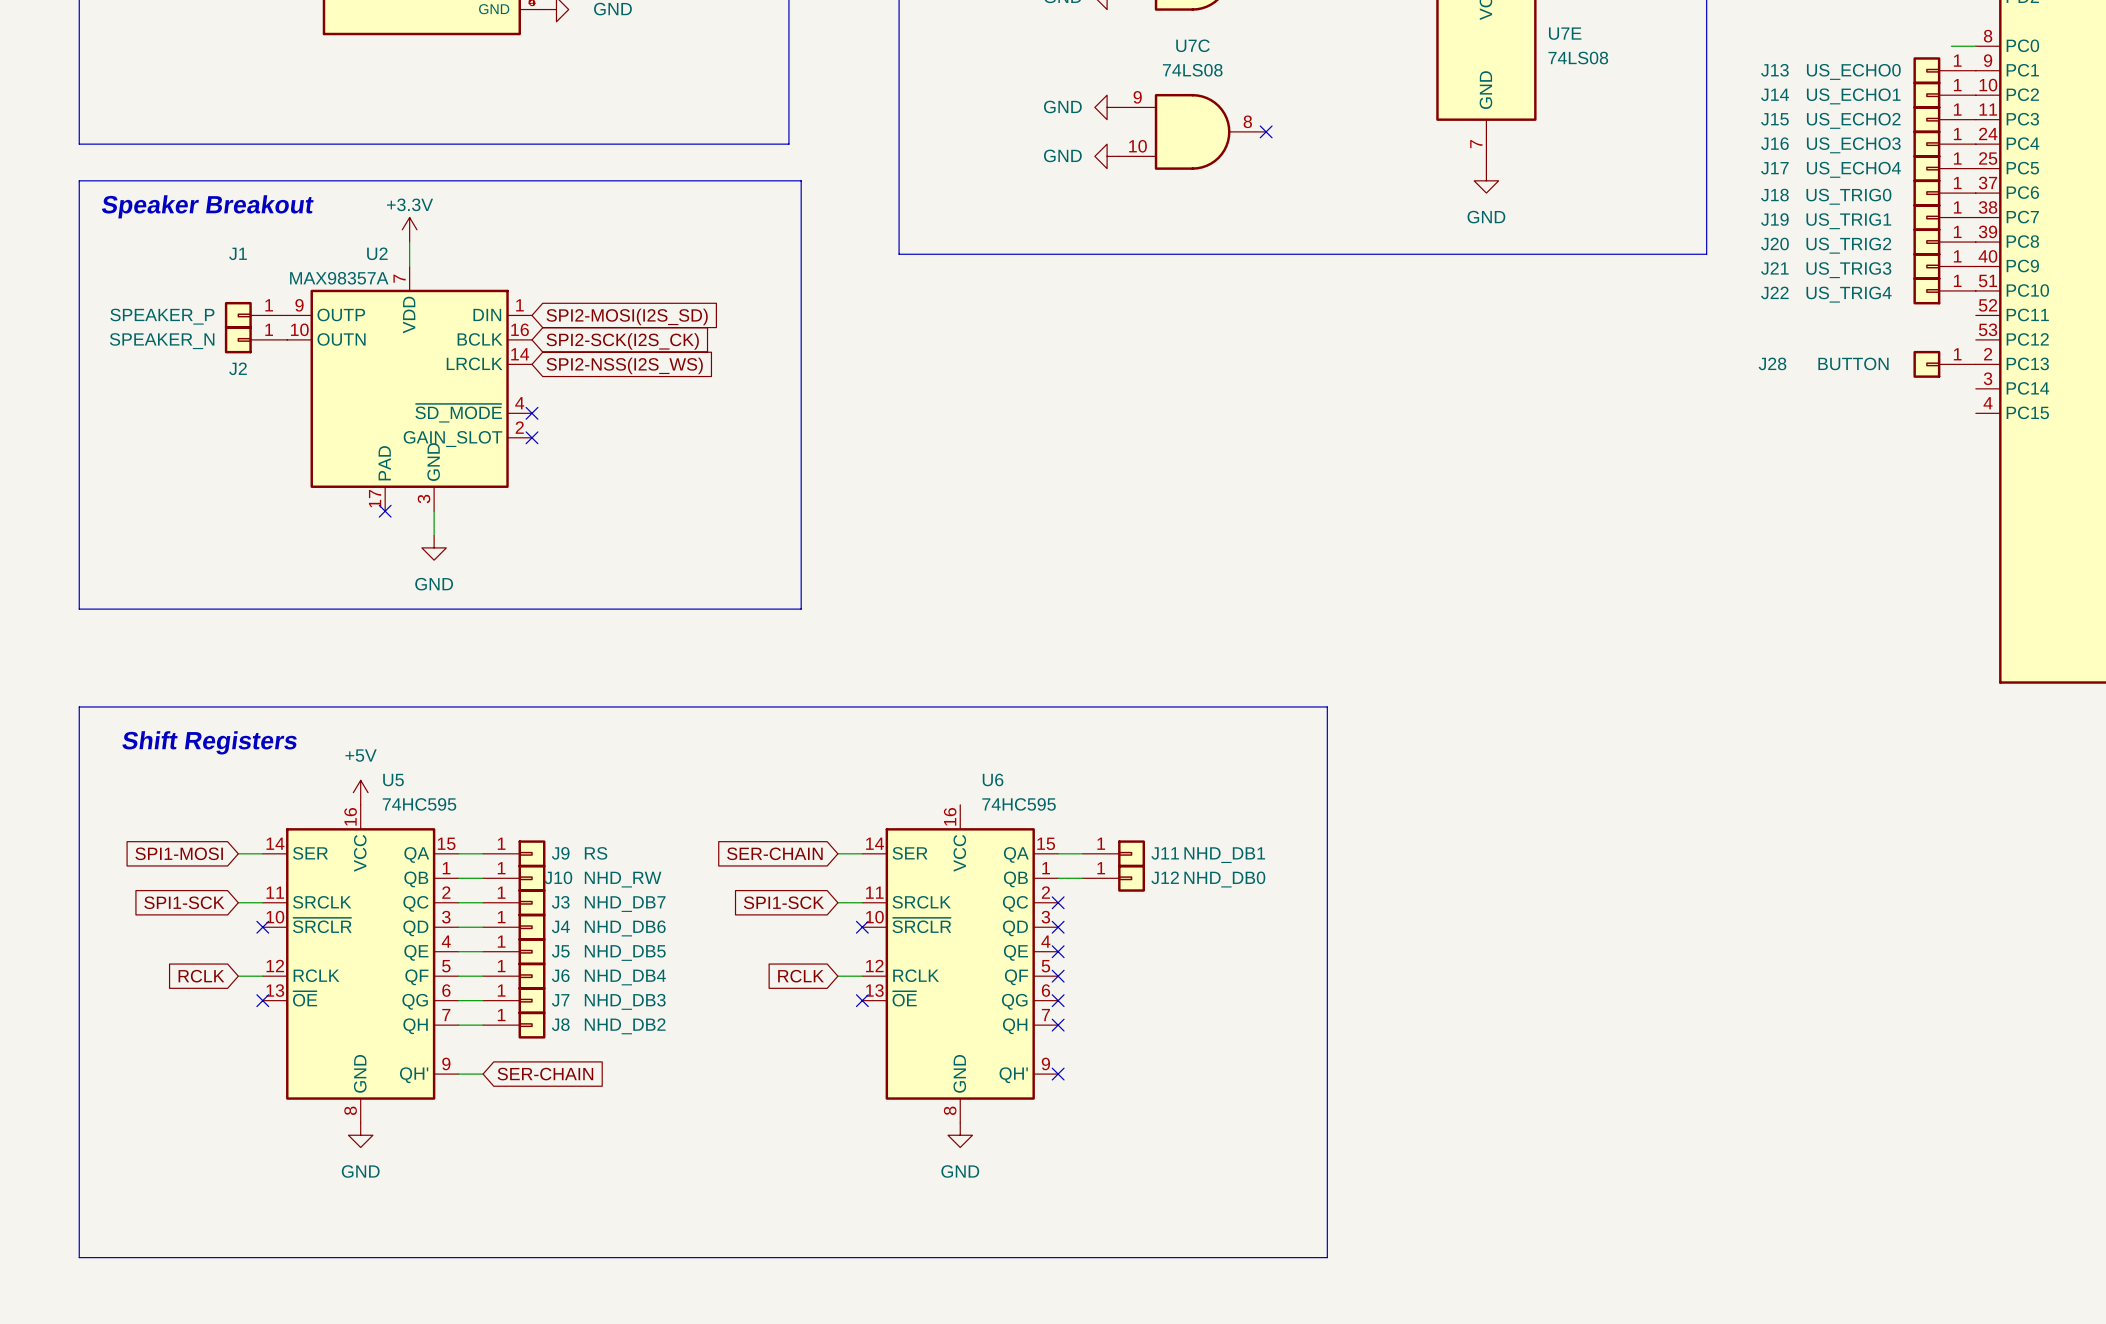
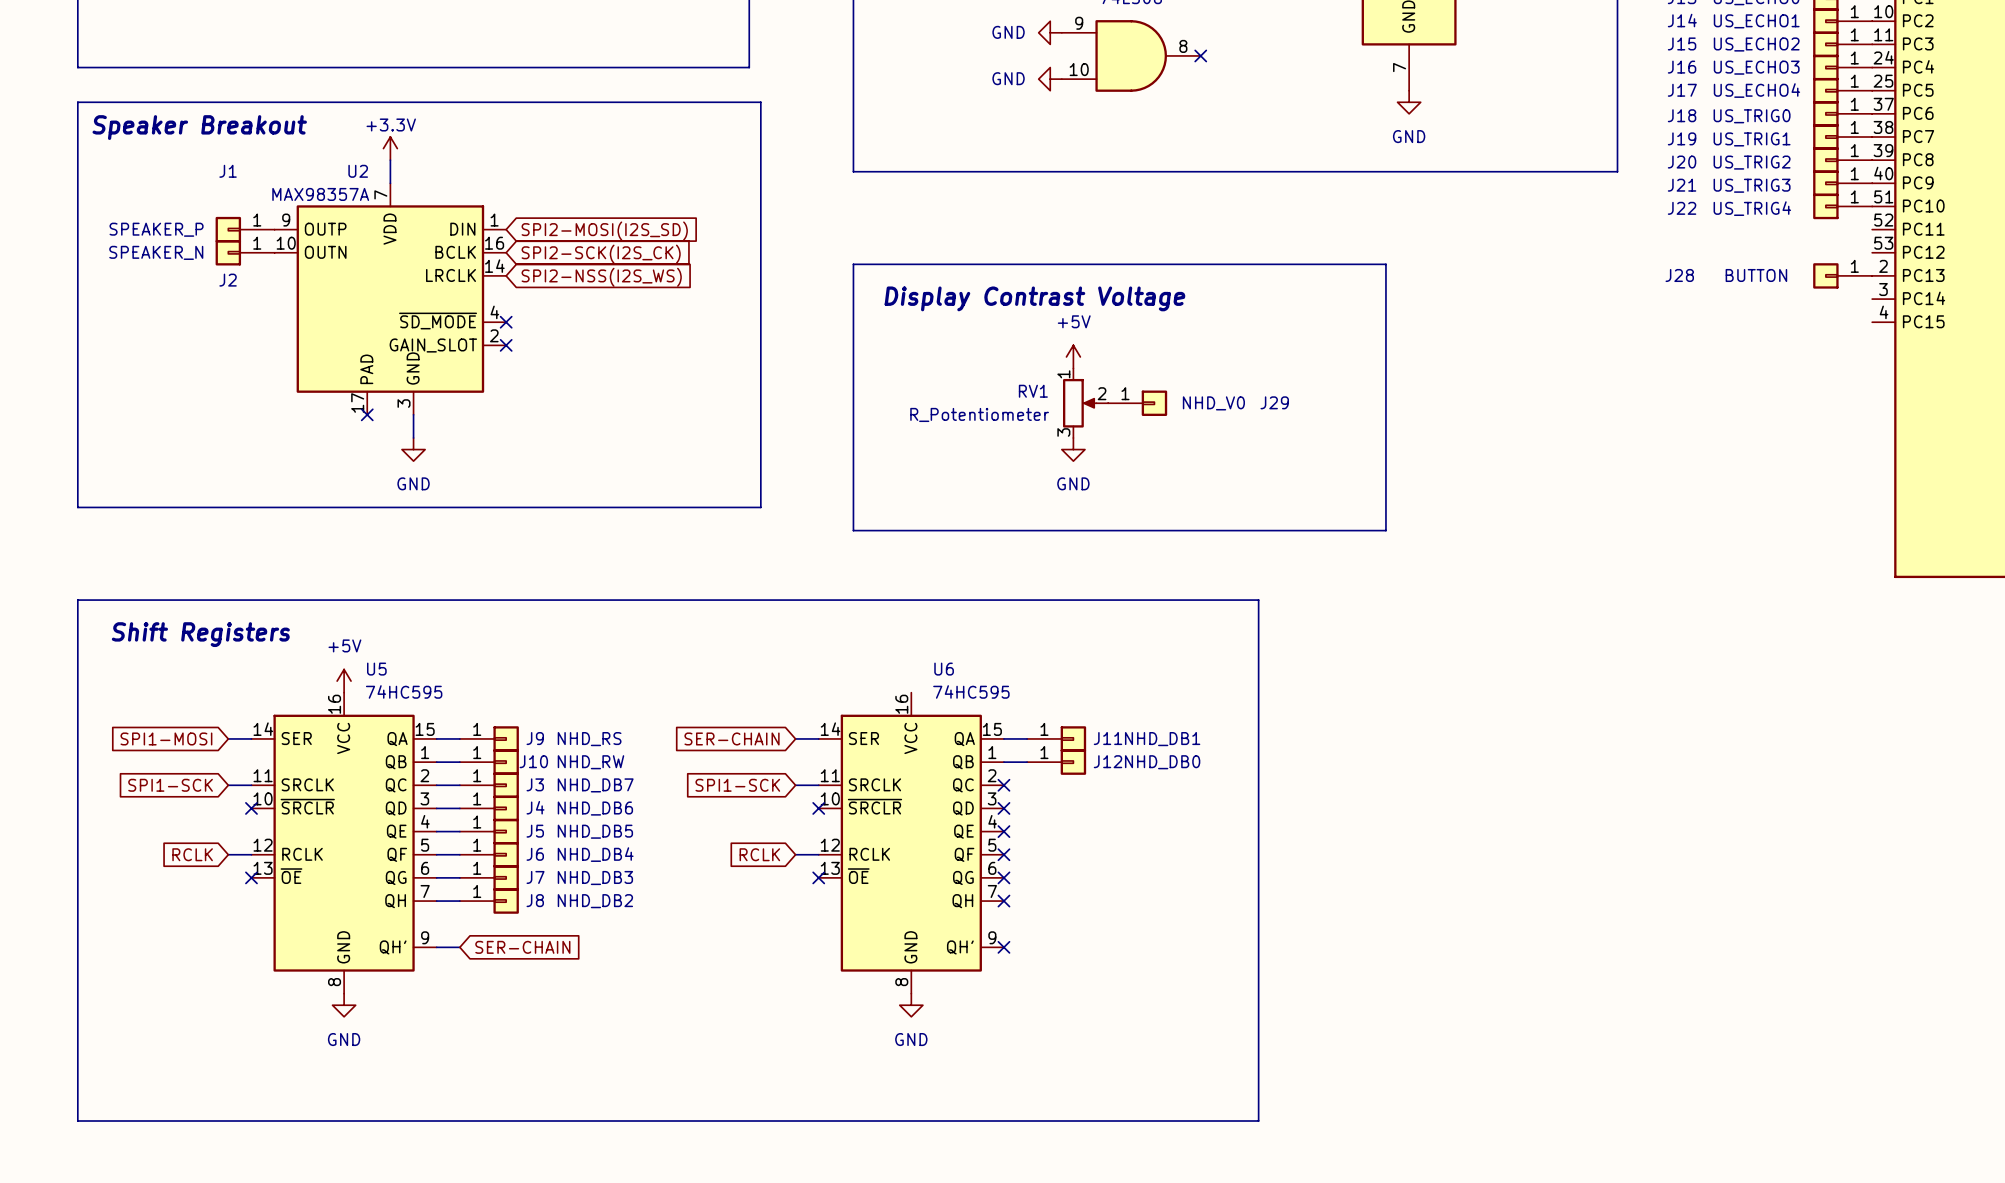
line: none -> (853, 264) (1385, 264) (1385, 530) (853, 530) (853, 264)
text: none -> Display Contrast Voltage (1034, 298)
power symbol: none -> +5V (1073, 356)
RV1: none -> R_Potentiometer (1085, 403)
J29: none -> NHD_V0 (1137, 403)
power symbol: none -> GND (1073, 449)
J9 value: RS (596, 853) -> NHD_RS (589, 739)

